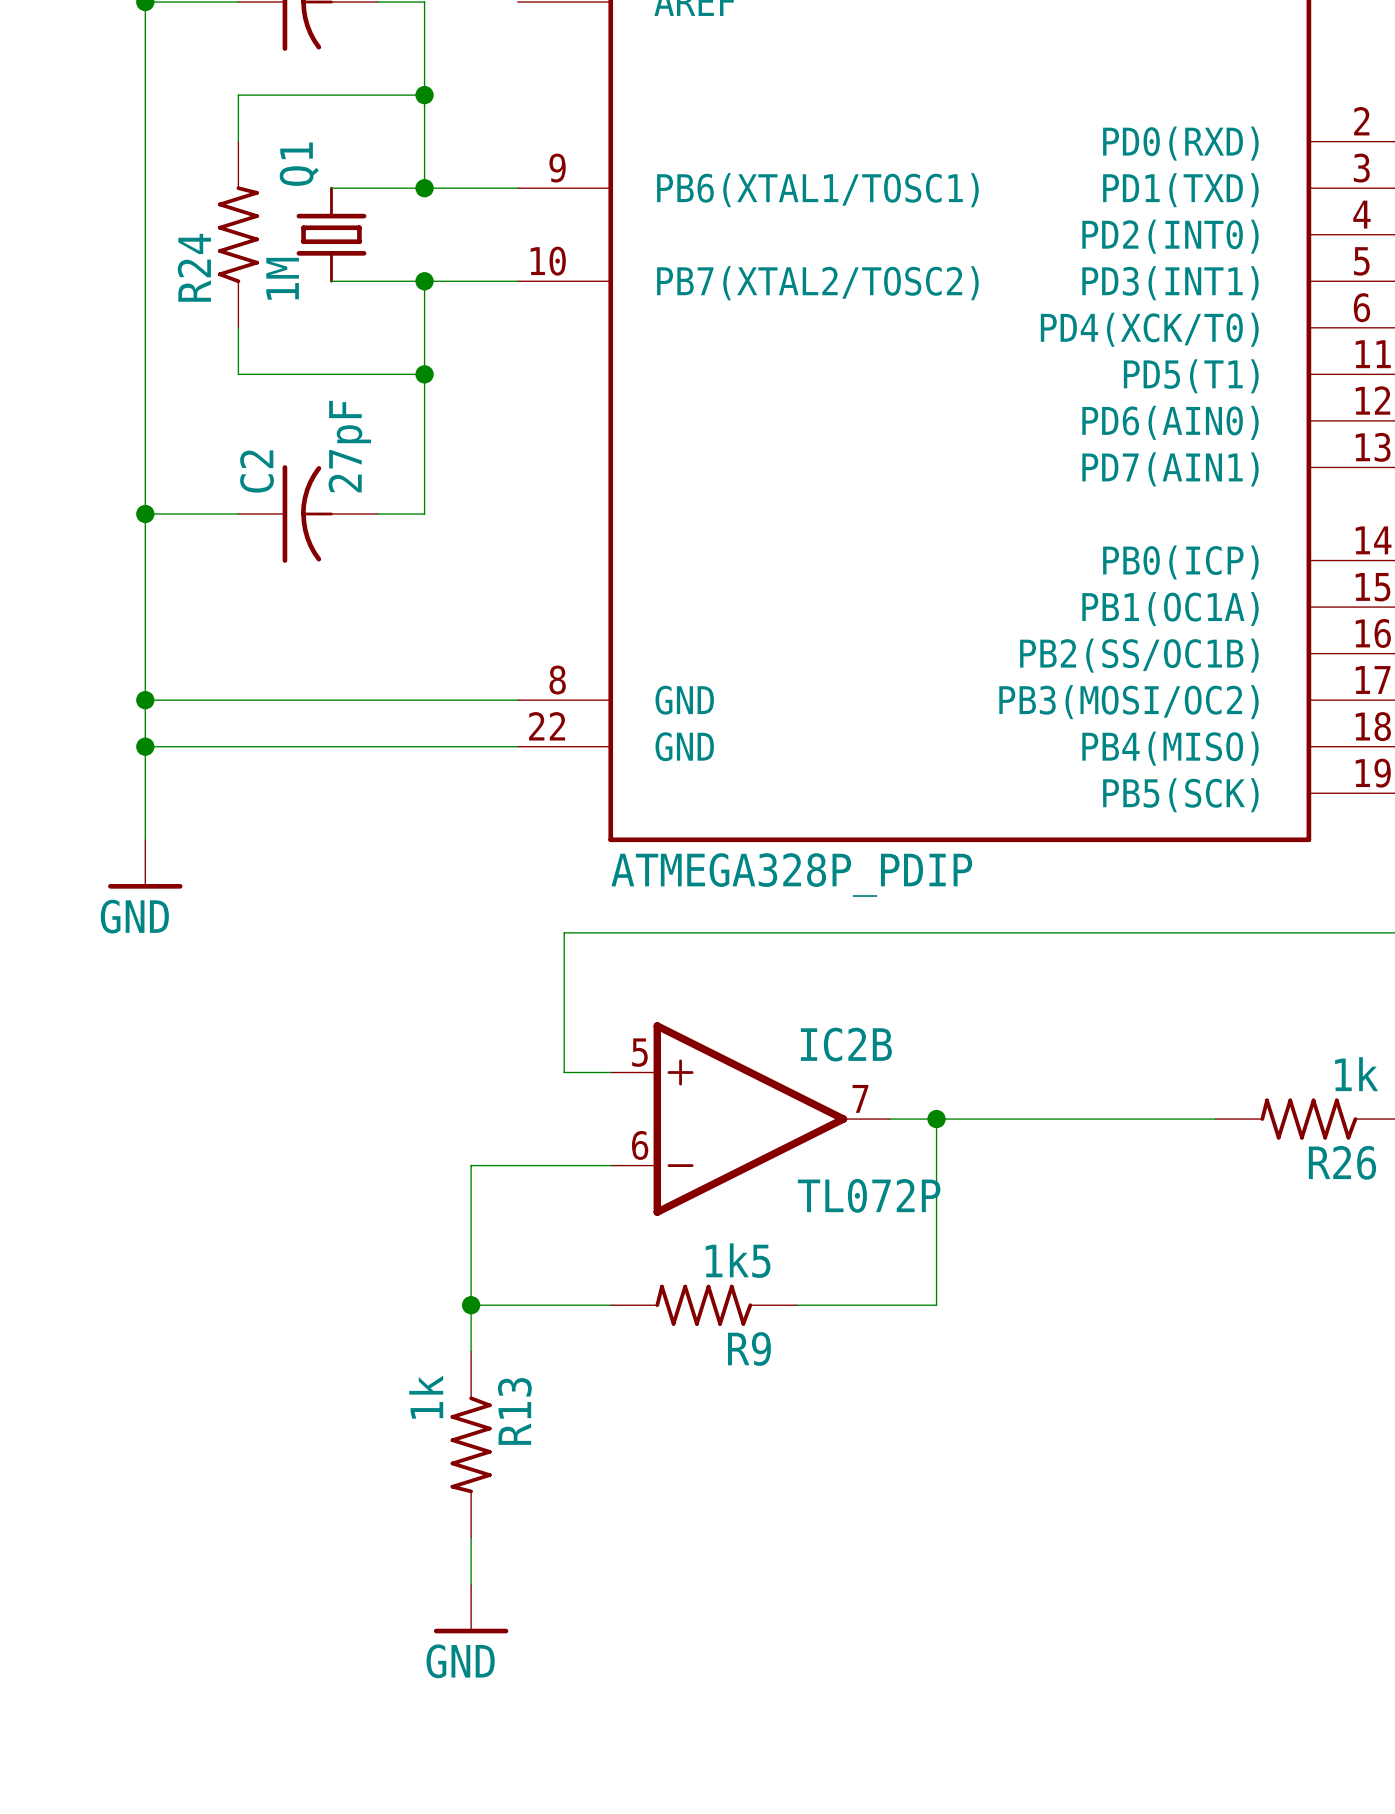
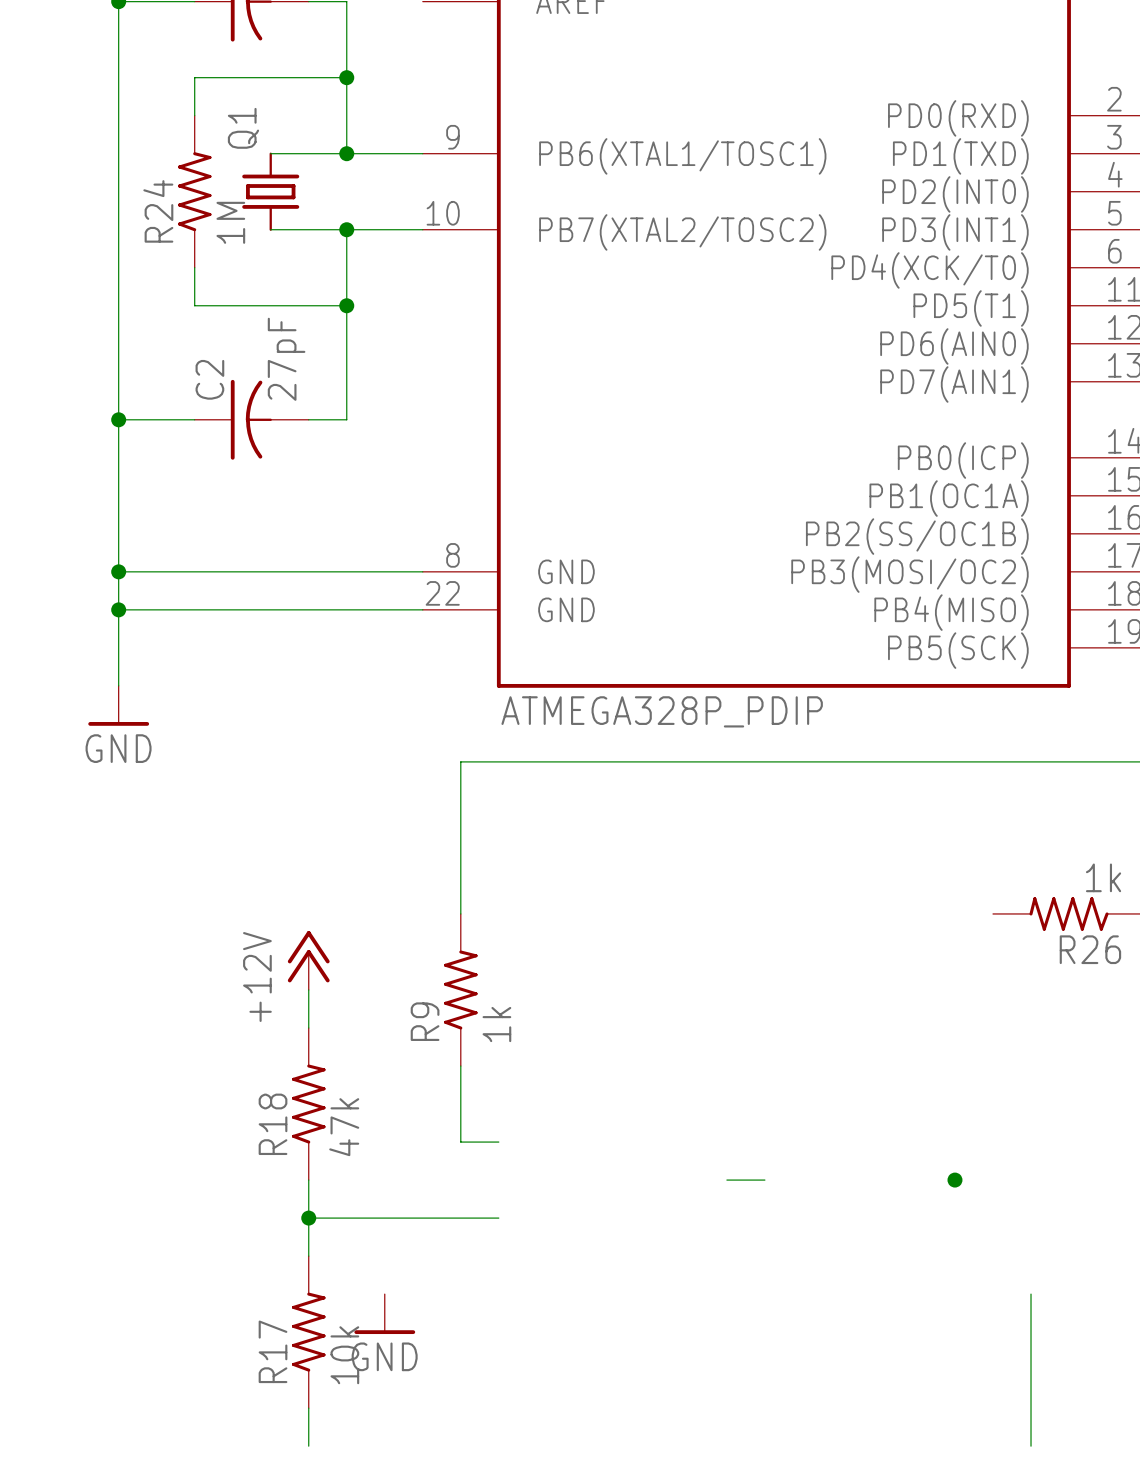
wire: (564, 1072) (610, 1072) -> (460, 875) (460, 913)
IC2B: TL072P (750, 1119) -> none
wire: (890, 1119) (1215, 1119) -> none
wire: (936, 1119) (936, 1305) (796, 1305) -> none
junction: (936, 1119) -> none
wire: (610, 1165) (471, 1165) (471, 1351) -> none
power symbol: none -> +12V (308, 960)
wire: none -> (308, 990) (308, 1028)
R9 value: 1k5 (738, 1260) -> 1k (496, 1024)
wire: (471, 1305) (610, 1305) -> none
junction: (471, 1305) -> none
wire: none -> (460, 1066) (460, 1142) (498, 1142)
R9 rotation: 0° (703, 1305) -> 90° clockwise (460, 990)
R9 position: (703, 1305) -> (460, 990)
R18: none -> 47k (308, 1104)
wire: none -> (308, 1180) (308, 1256)
R13: 1k (471, 1444) -> none
wire: none -> (726, 1180) (764, 1180)
junction: none -> (954, 1180)
wire: none -> (308, 1218) (498, 1218)
junction: none -> (308, 1218)
wire: (471, 1537) (471, 1584) -> (308, 1408) (308, 1446)
wire: none -> (1031, 1294) (1031, 1446)
R17: none -> 10k (308, 1332)

